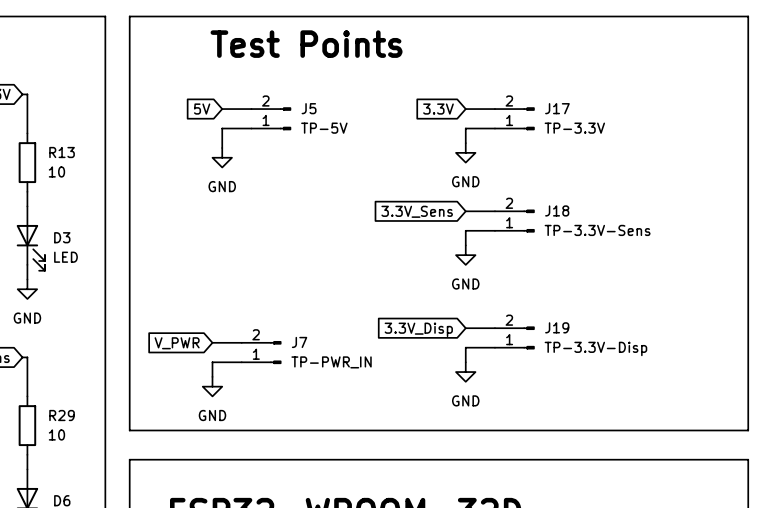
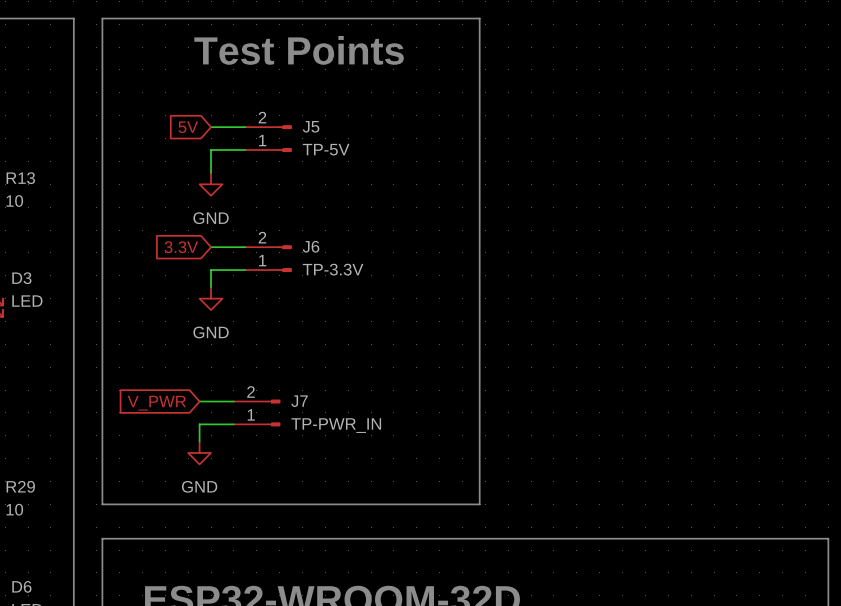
line: (451, 16) (748, 16) (748, 430) (451, 430) -> (479, 18) (479, 504)
global label: 3.3V (438, 109) -> none
wire: (465, 109) (494, 109) -> none
J17: TP-3.3V (514, 118) -> none
wire: (494, 128) (465, 128) (465, 143) -> none
power symbol: GND (465, 152) -> none
global label: none -> 3.3V (181, 247)
wire: none -> (211, 247) (245, 247)
global label: 3.3V_Sens (417, 211) -> none
wire: (465, 211) (494, 211) -> none
J6: none -> TP-3.3V (268, 258)
J18: TP-3.3V-Sens (514, 221) -> none
wire: none -> (245, 270) (211, 270) (211, 287)
wire: (494, 230) (465, 230) (465, 245) -> none
power symbol: none -> GND (211, 298)
power symbol: GND (465, 255) -> none
wire: (465, 328) (494, 328) -> none
global label: 3.3V_Disp (418, 329) -> none
J19: TP-3.3V-Disp (514, 337) -> none
wire: (494, 347) (465, 347) (465, 362) -> none
power symbol: GND (465, 372) -> none

